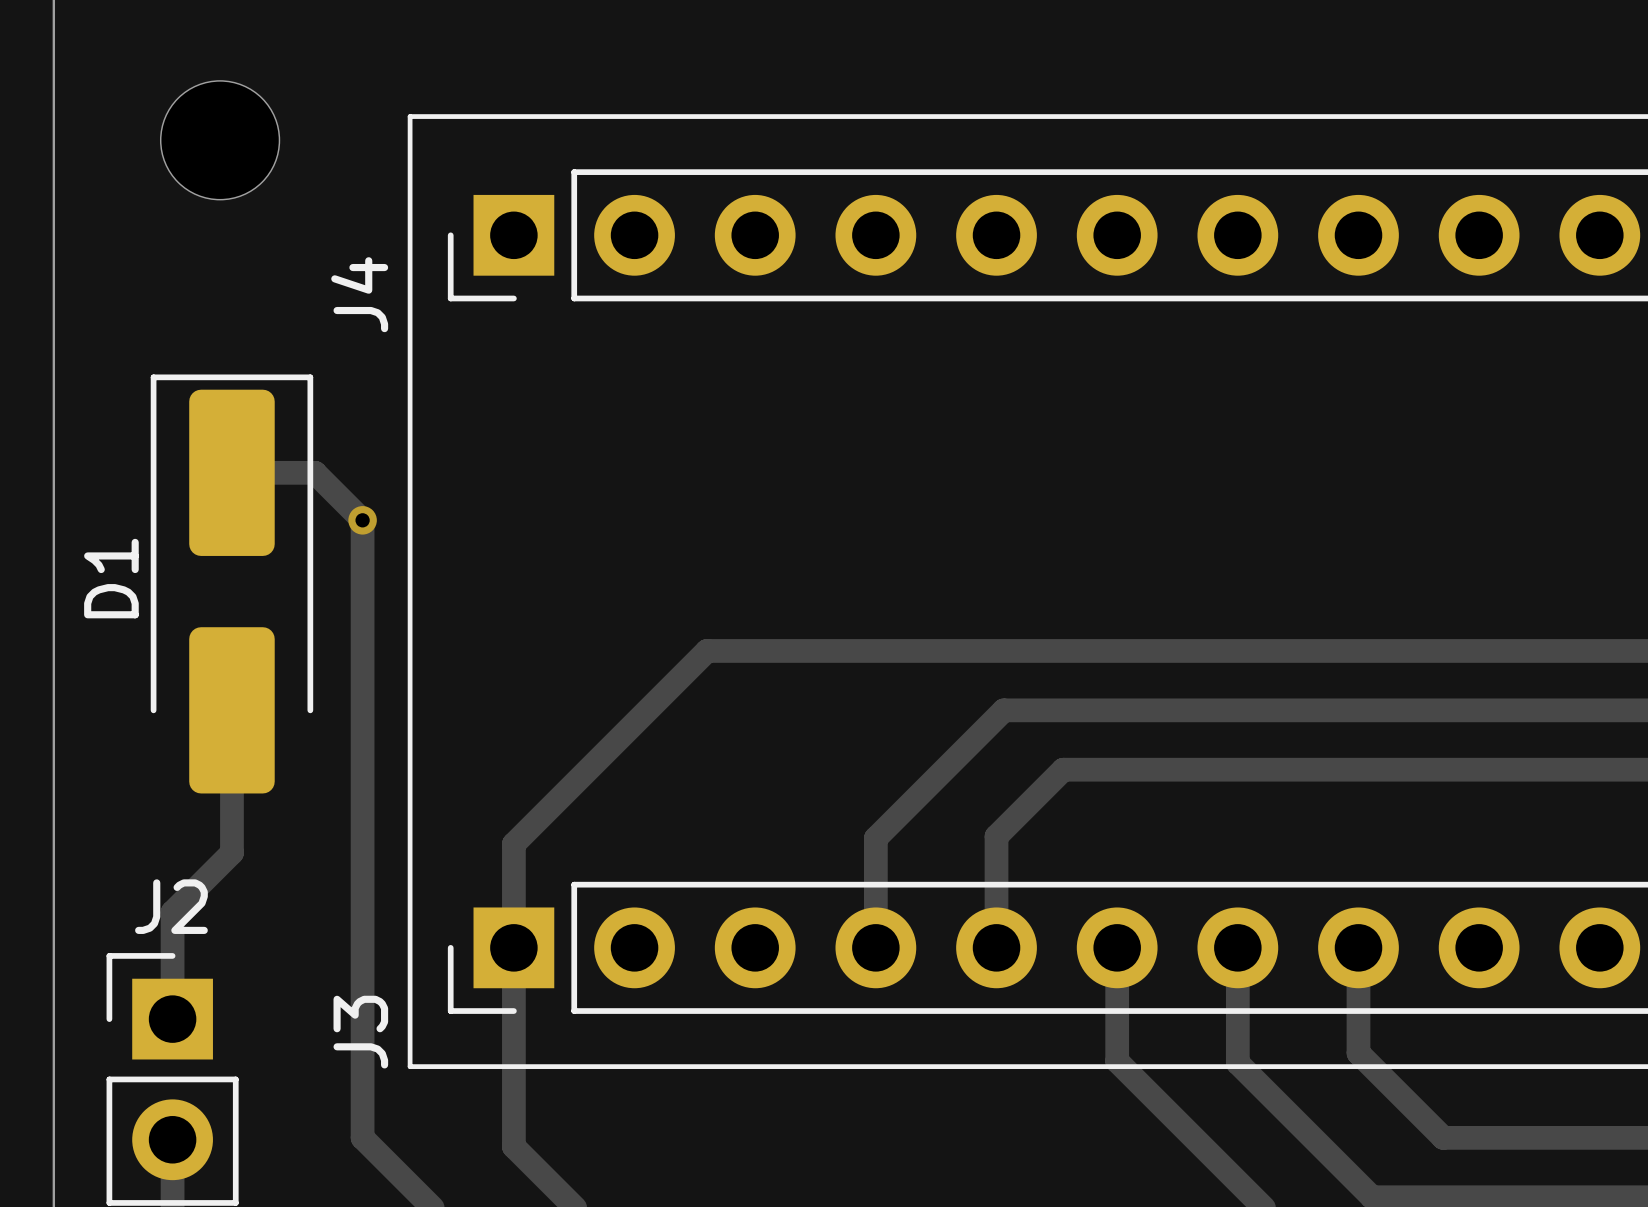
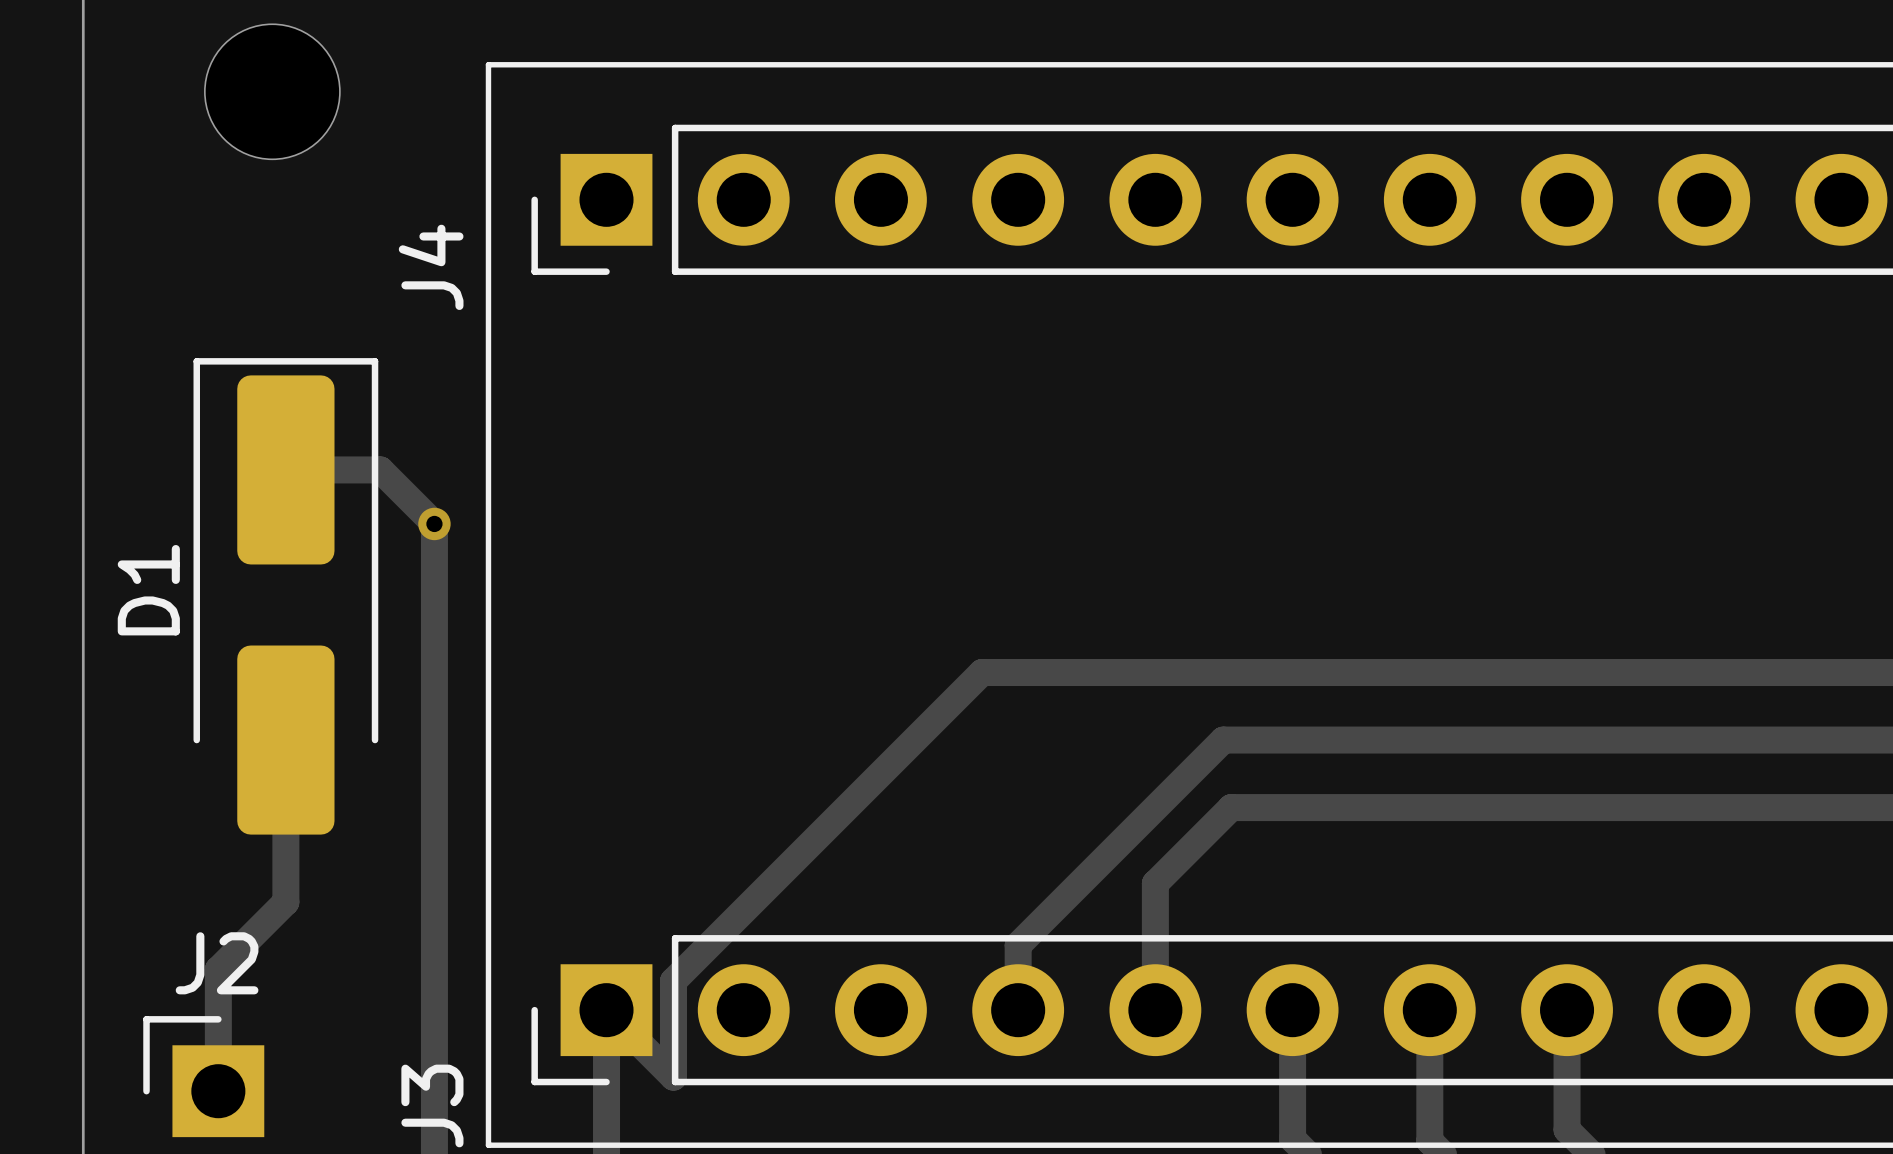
track: (844, 650) (706, 650) (513, 844) (513, 947) -> (982, 672) (673, 981) (673, 1077) (606, 1010)
track: (1056, 710) (1003, 710) (875, 838) (875, 890) -> (1223, 740) (1018, 945)

